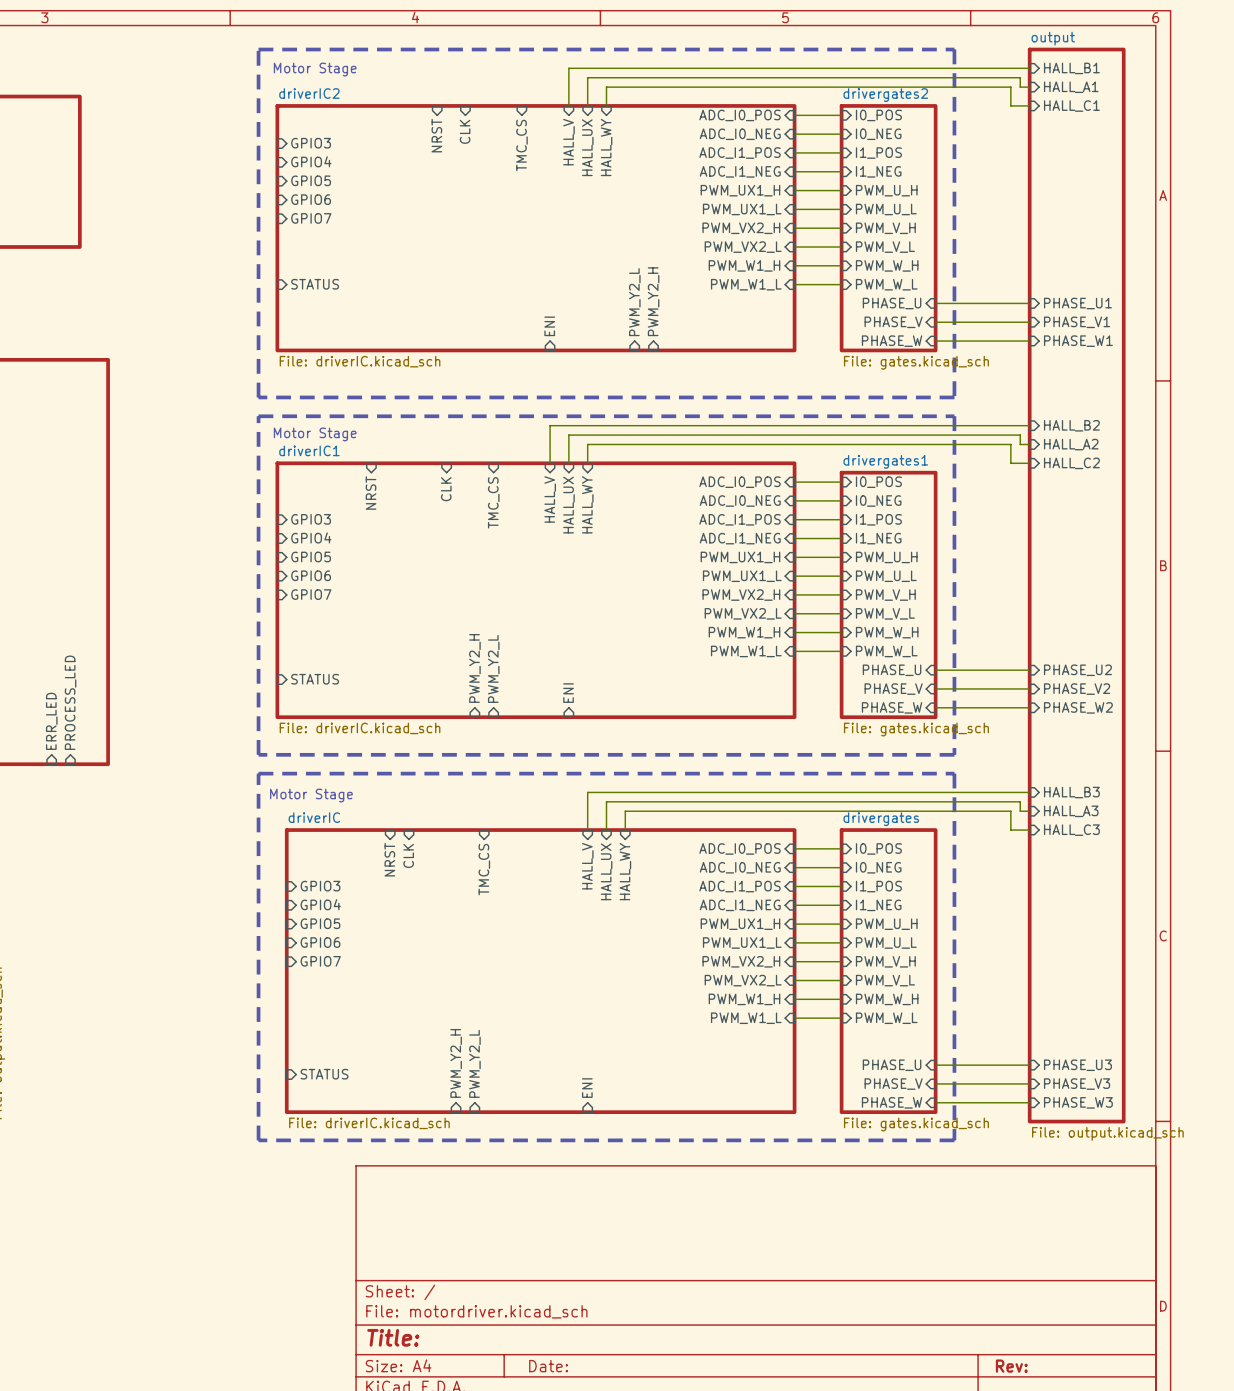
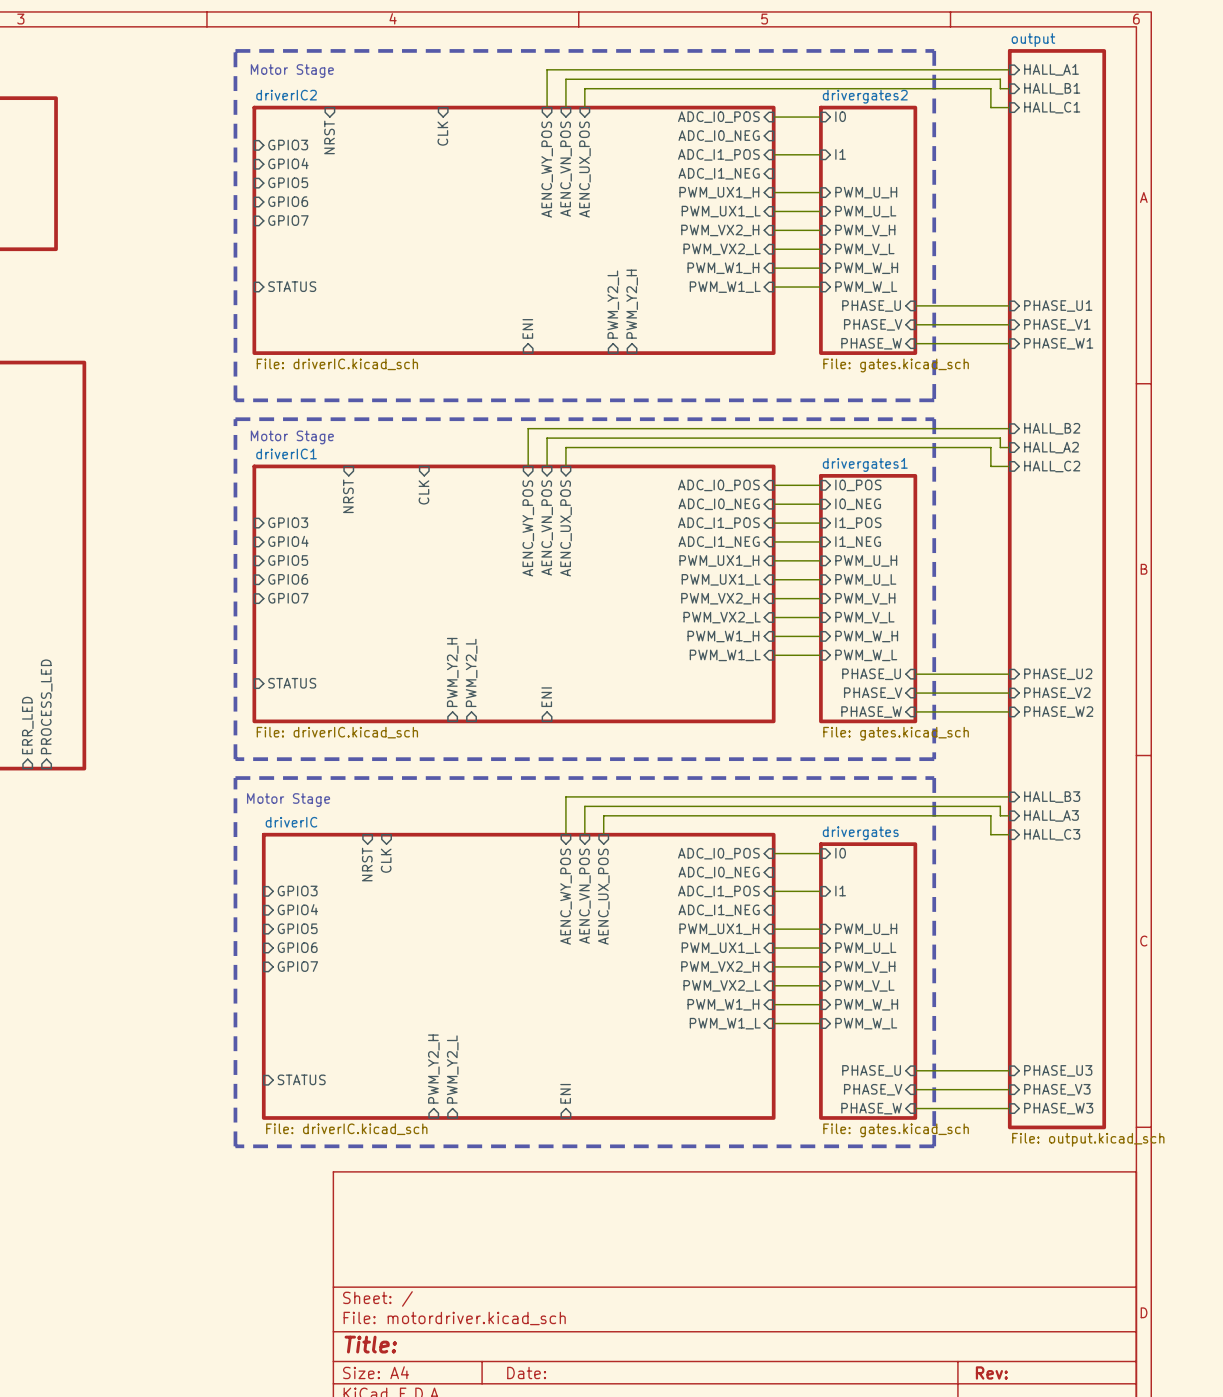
sheet pin: HALL_B1 (1071, 68) -> HALL_A1 (1051, 69)
sheet pin: HALL_A1 (1071, 87) -> HALL_B1 (1052, 88)
sheet pin: I0_POS (878, 115) -> I0 (840, 116)
wire: (794, 134) (841, 134) -> none
sheet pin: I0_NEG (878, 134) -> none
sheet pin position: NRST (436, 135) -> NRST (329, 137)
sheet pin: HALL_V (568, 142) -> AENC_WY_POS (547, 169)
sheet pin: TMC_CS (521, 145) -> none
sheet pin: HALL_UX (587, 147) -> AENC_VN_POS (566, 169)
sheet pin: HALL_WY (606, 147) -> AENC_UX_POS (584, 169)
sheet pin: I1_POS (878, 153) -> I1 (840, 154)
wire: (794, 171) (841, 171) -> none
sheet pin: I1_NEG (878, 171) -> none
sheet pin: HALL_V (550, 499) -> AENC_WY_POS (528, 528)
sheet pin: TMC_CS (493, 502) -> none
sheet pin: HALL_WY (587, 504) -> AENC_UX_POS (566, 528)
sheet pin: HALL_UX (568, 505) -> AENC_VN_POS (547, 527)
sheet drivergates shape: [839, 828, 938, 1115] -> [819, 842, 918, 1120]
sheet pin: I0_POS (878, 848) -> I0 (840, 853)
sheet pin: HALL_V (587, 866) -> AENC_WY_POS (566, 896)
wire: (794, 867) (841, 867) -> none
sheet pin: I0_NEG (878, 867) -> none
sheet pin: TMC_CS (484, 869) -> none
sheet pin: HALL_UX (606, 871) -> AENC_VN_POS (584, 896)
sheet pin: HALL_WY (625, 871) -> AENC_UX_POS (603, 896)
sheet pin: I1_POS (878, 886) -> I1 (840, 891)
wire: (794, 905) (841, 905) -> none
sheet pin: I1_NEG (878, 905) -> none

